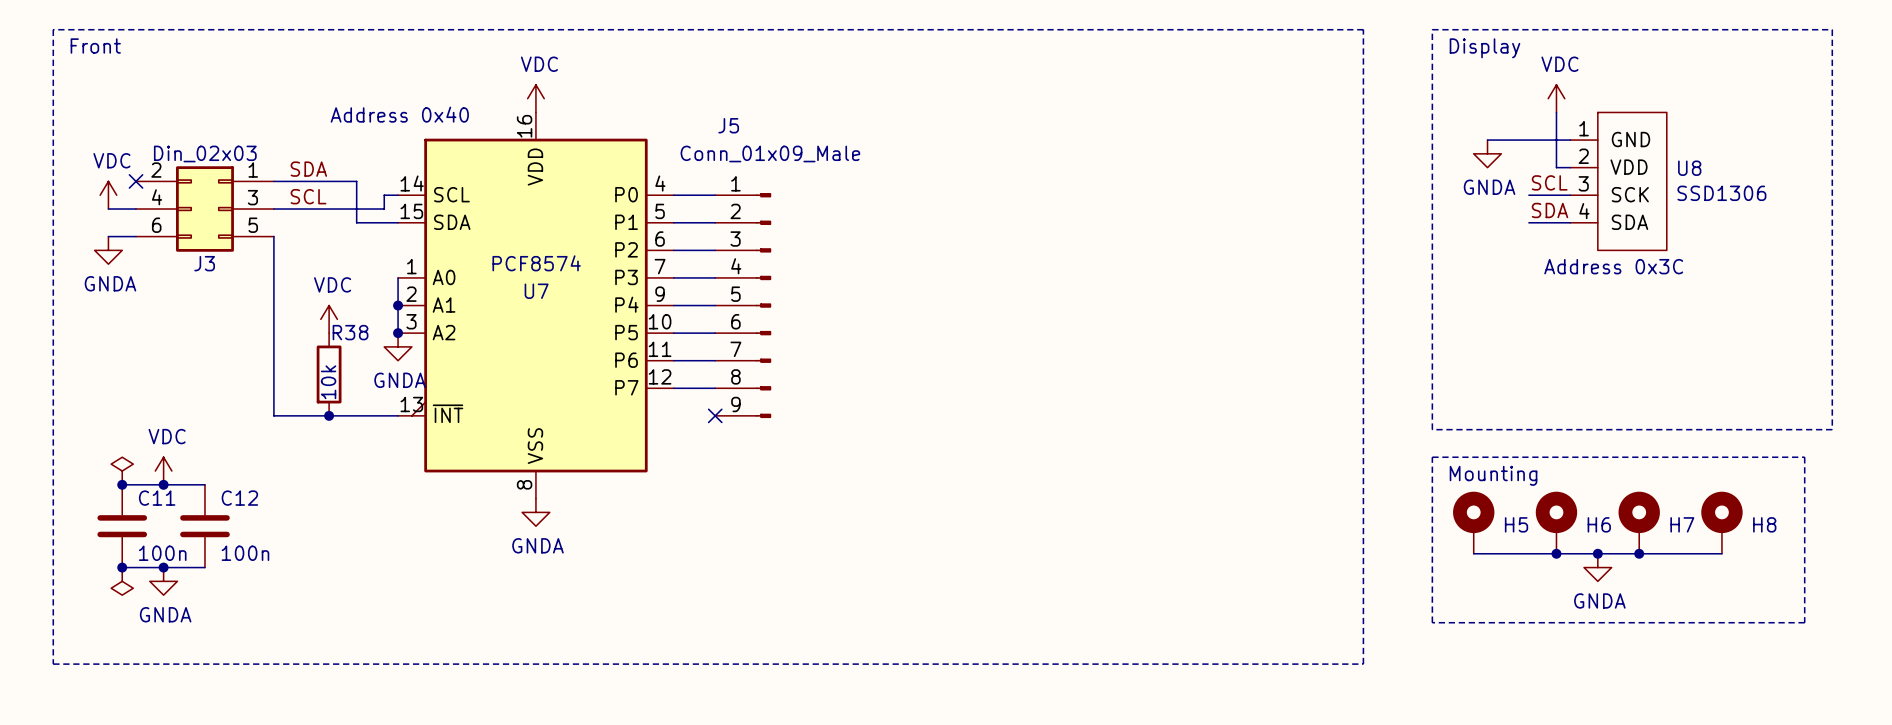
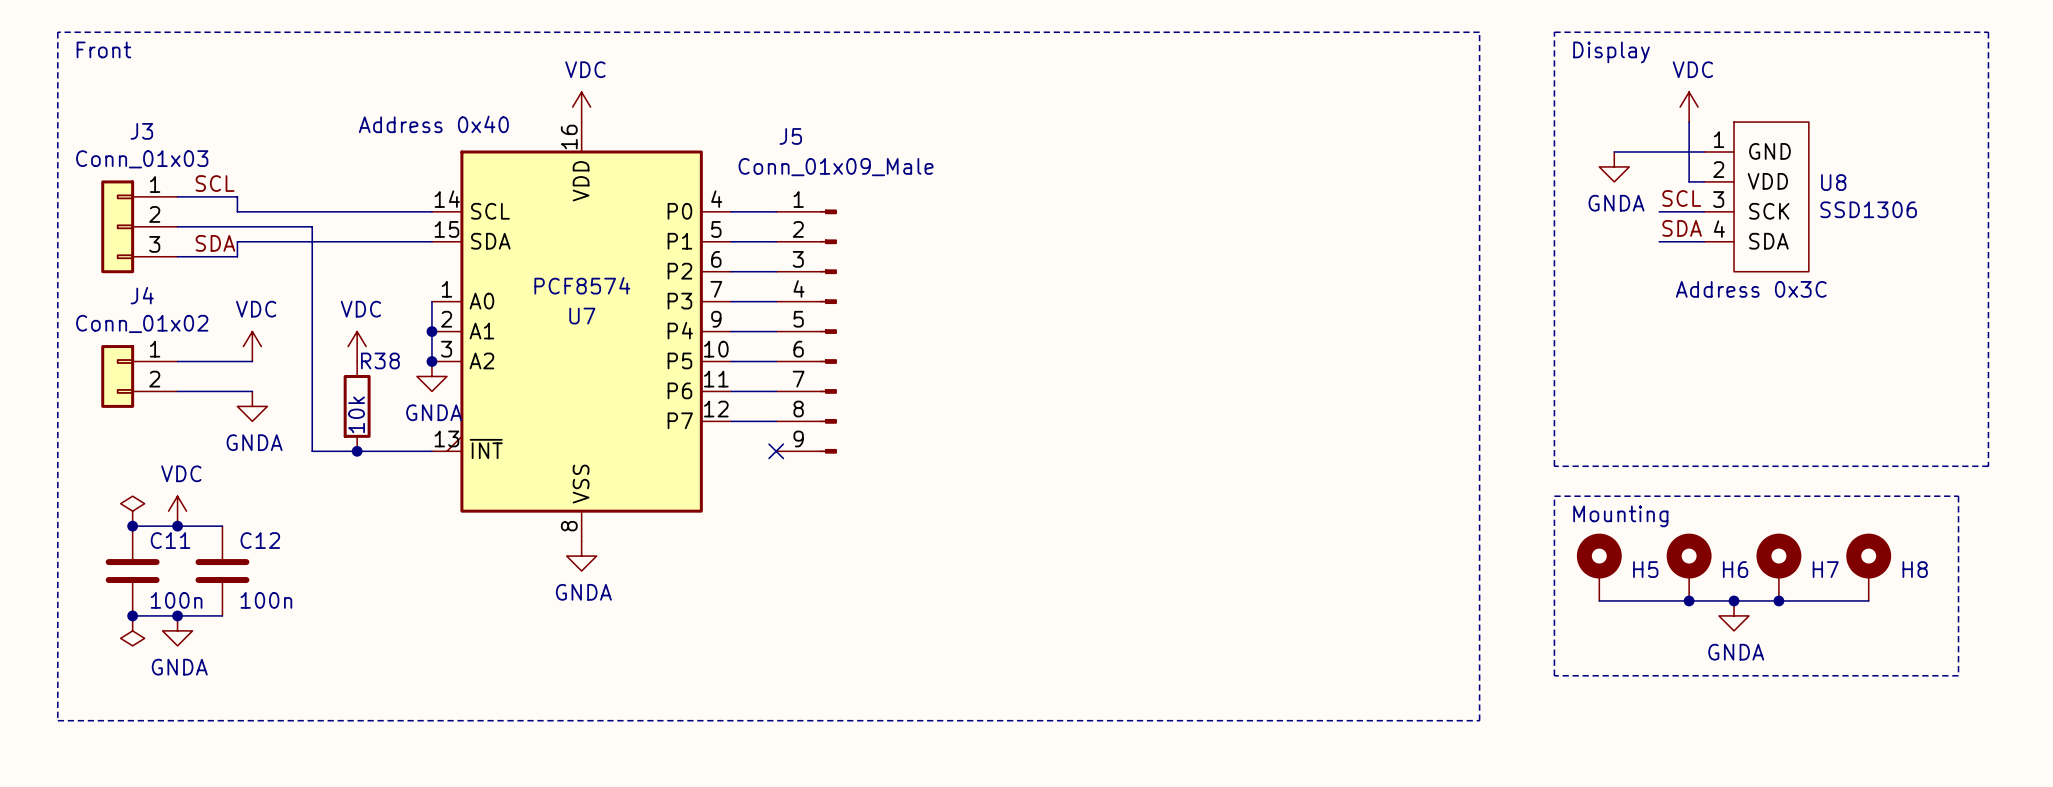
J3 value: Din_02x03 (205, 153) -> Conn_01x03 (142, 159)
J3 symbol: [136, 166, 274, 252] -> [101, 180, 178, 274]
label position: SDA (308, 169) -> SDA (215, 243)
no-connect mark: (136, 181) -> none
wire: (273, 181) (356, 181) (356, 222) -> (177, 256) (237, 256) (237, 241) (387, 241)
power symbol position: VDC (108, 195) -> VDC (252, 346)
wire: (384, 195) (384, 209) (287, 209) -> (417, 211) (237, 211) (237, 196) (177, 196)
label position: SCL (308, 196) -> SCL (215, 183)
wire: (273, 236) (273, 415) (287, 415) -> (312, 226) (312, 451)
power symbol position: GNDA (108, 250) -> GNDA (252, 406)
J3 name position: J3 (204, 263) -> J3 (141, 131)
wire: none -> (177, 361) (252, 361)
J4: none -> Conn_01x02 (139, 376)
wire: none -> (177, 391) (252, 391)

